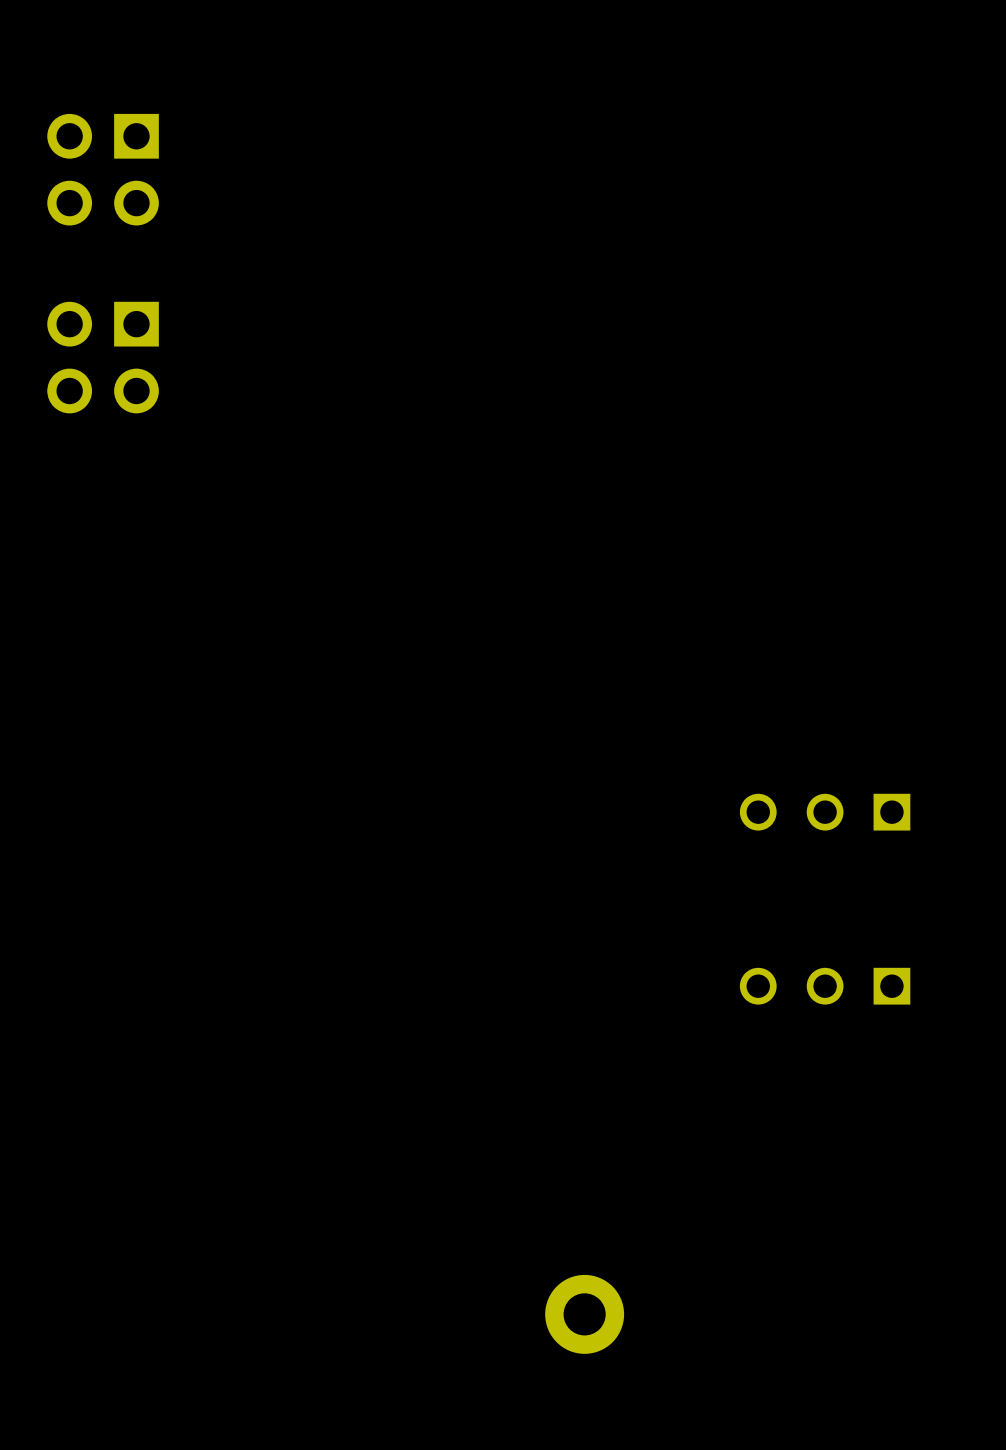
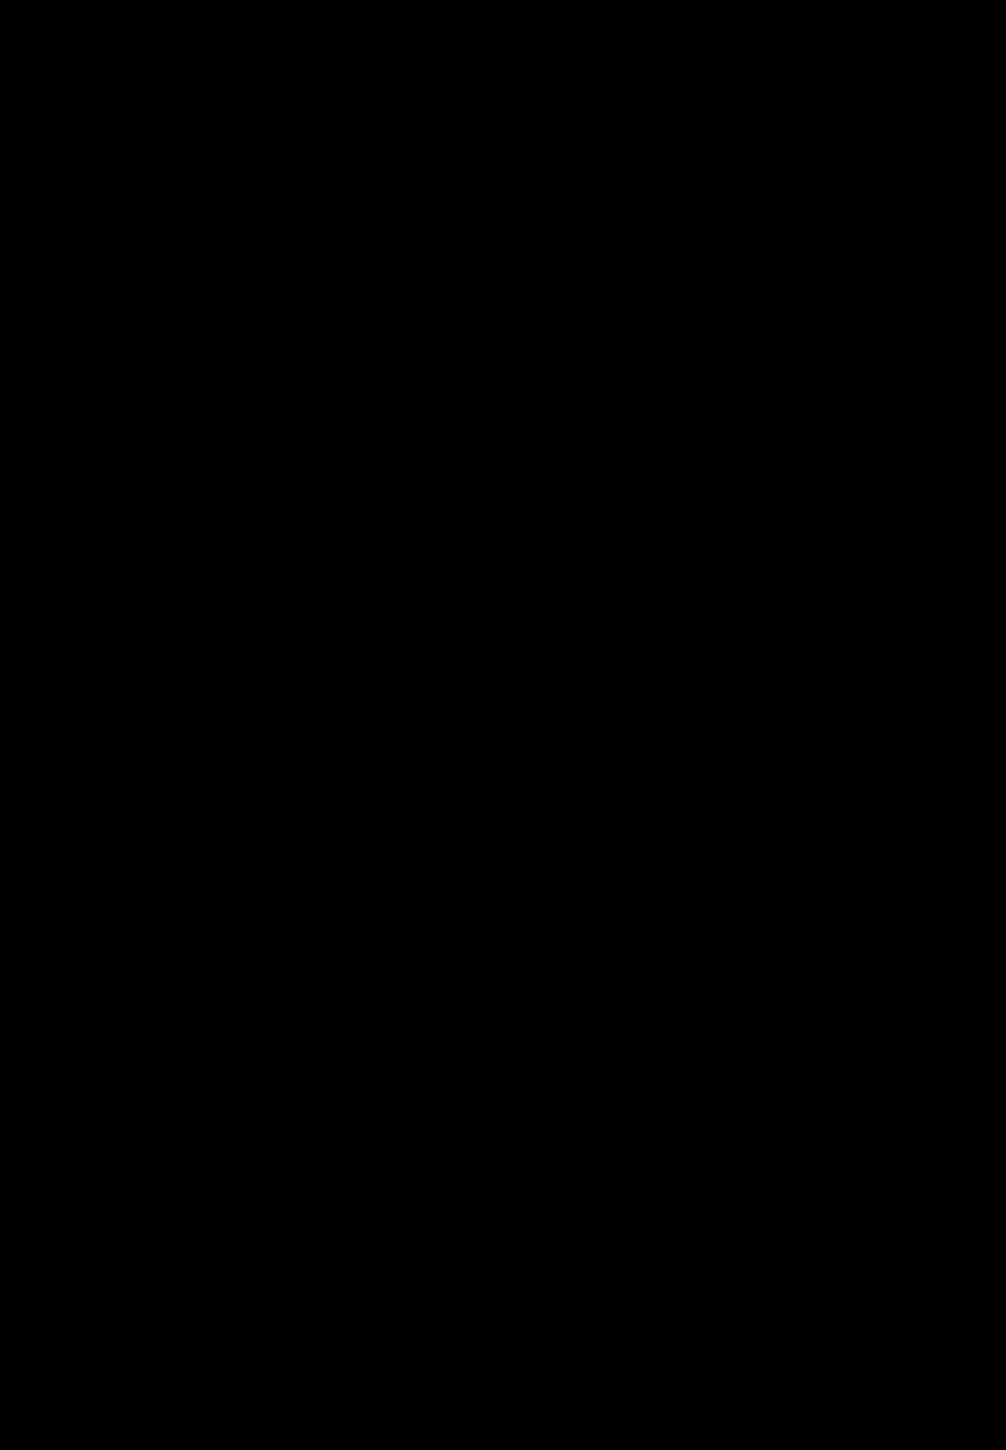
part: (103, 169) -> none
part: (103, 357) -> none
part: (825, 812) -> none
part: (825, 986) -> none
part: (584, 1314) -> none

